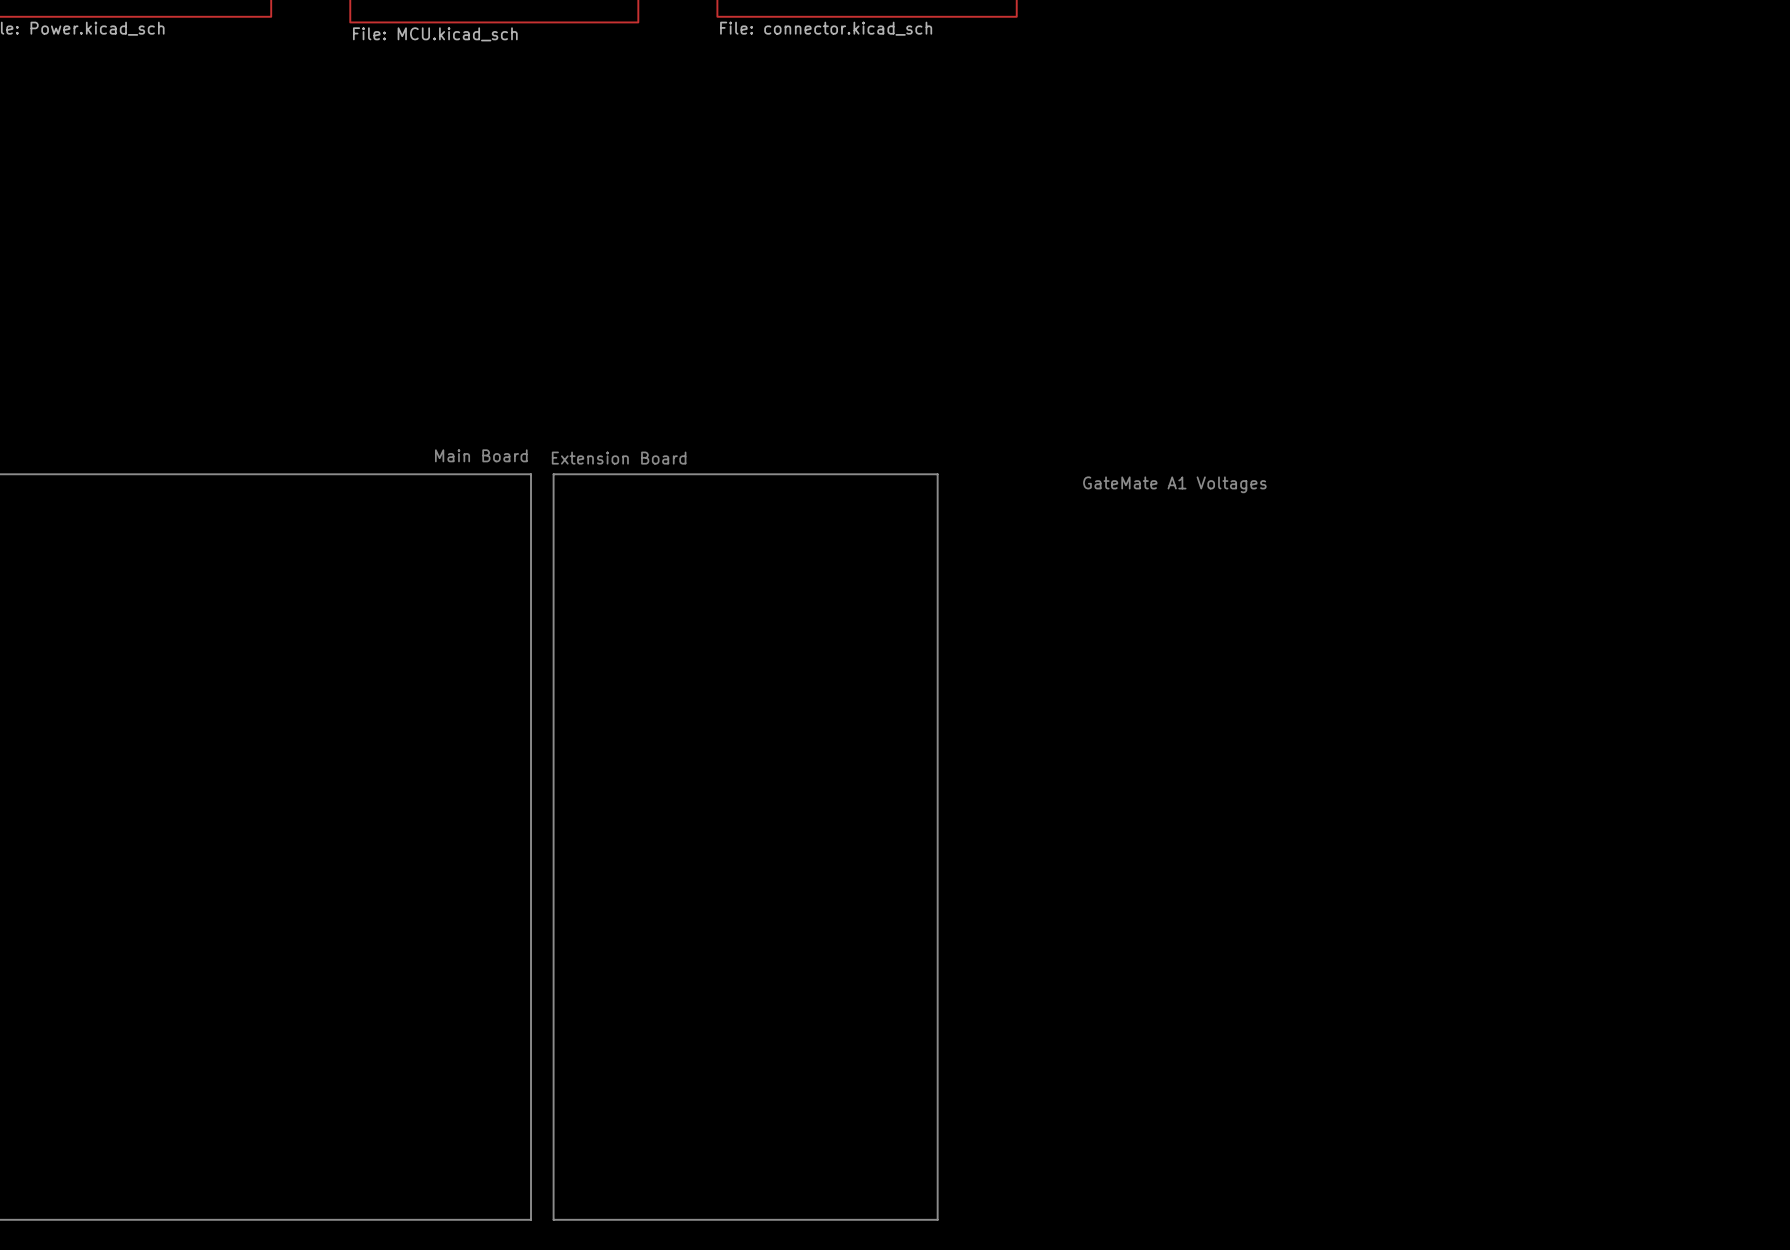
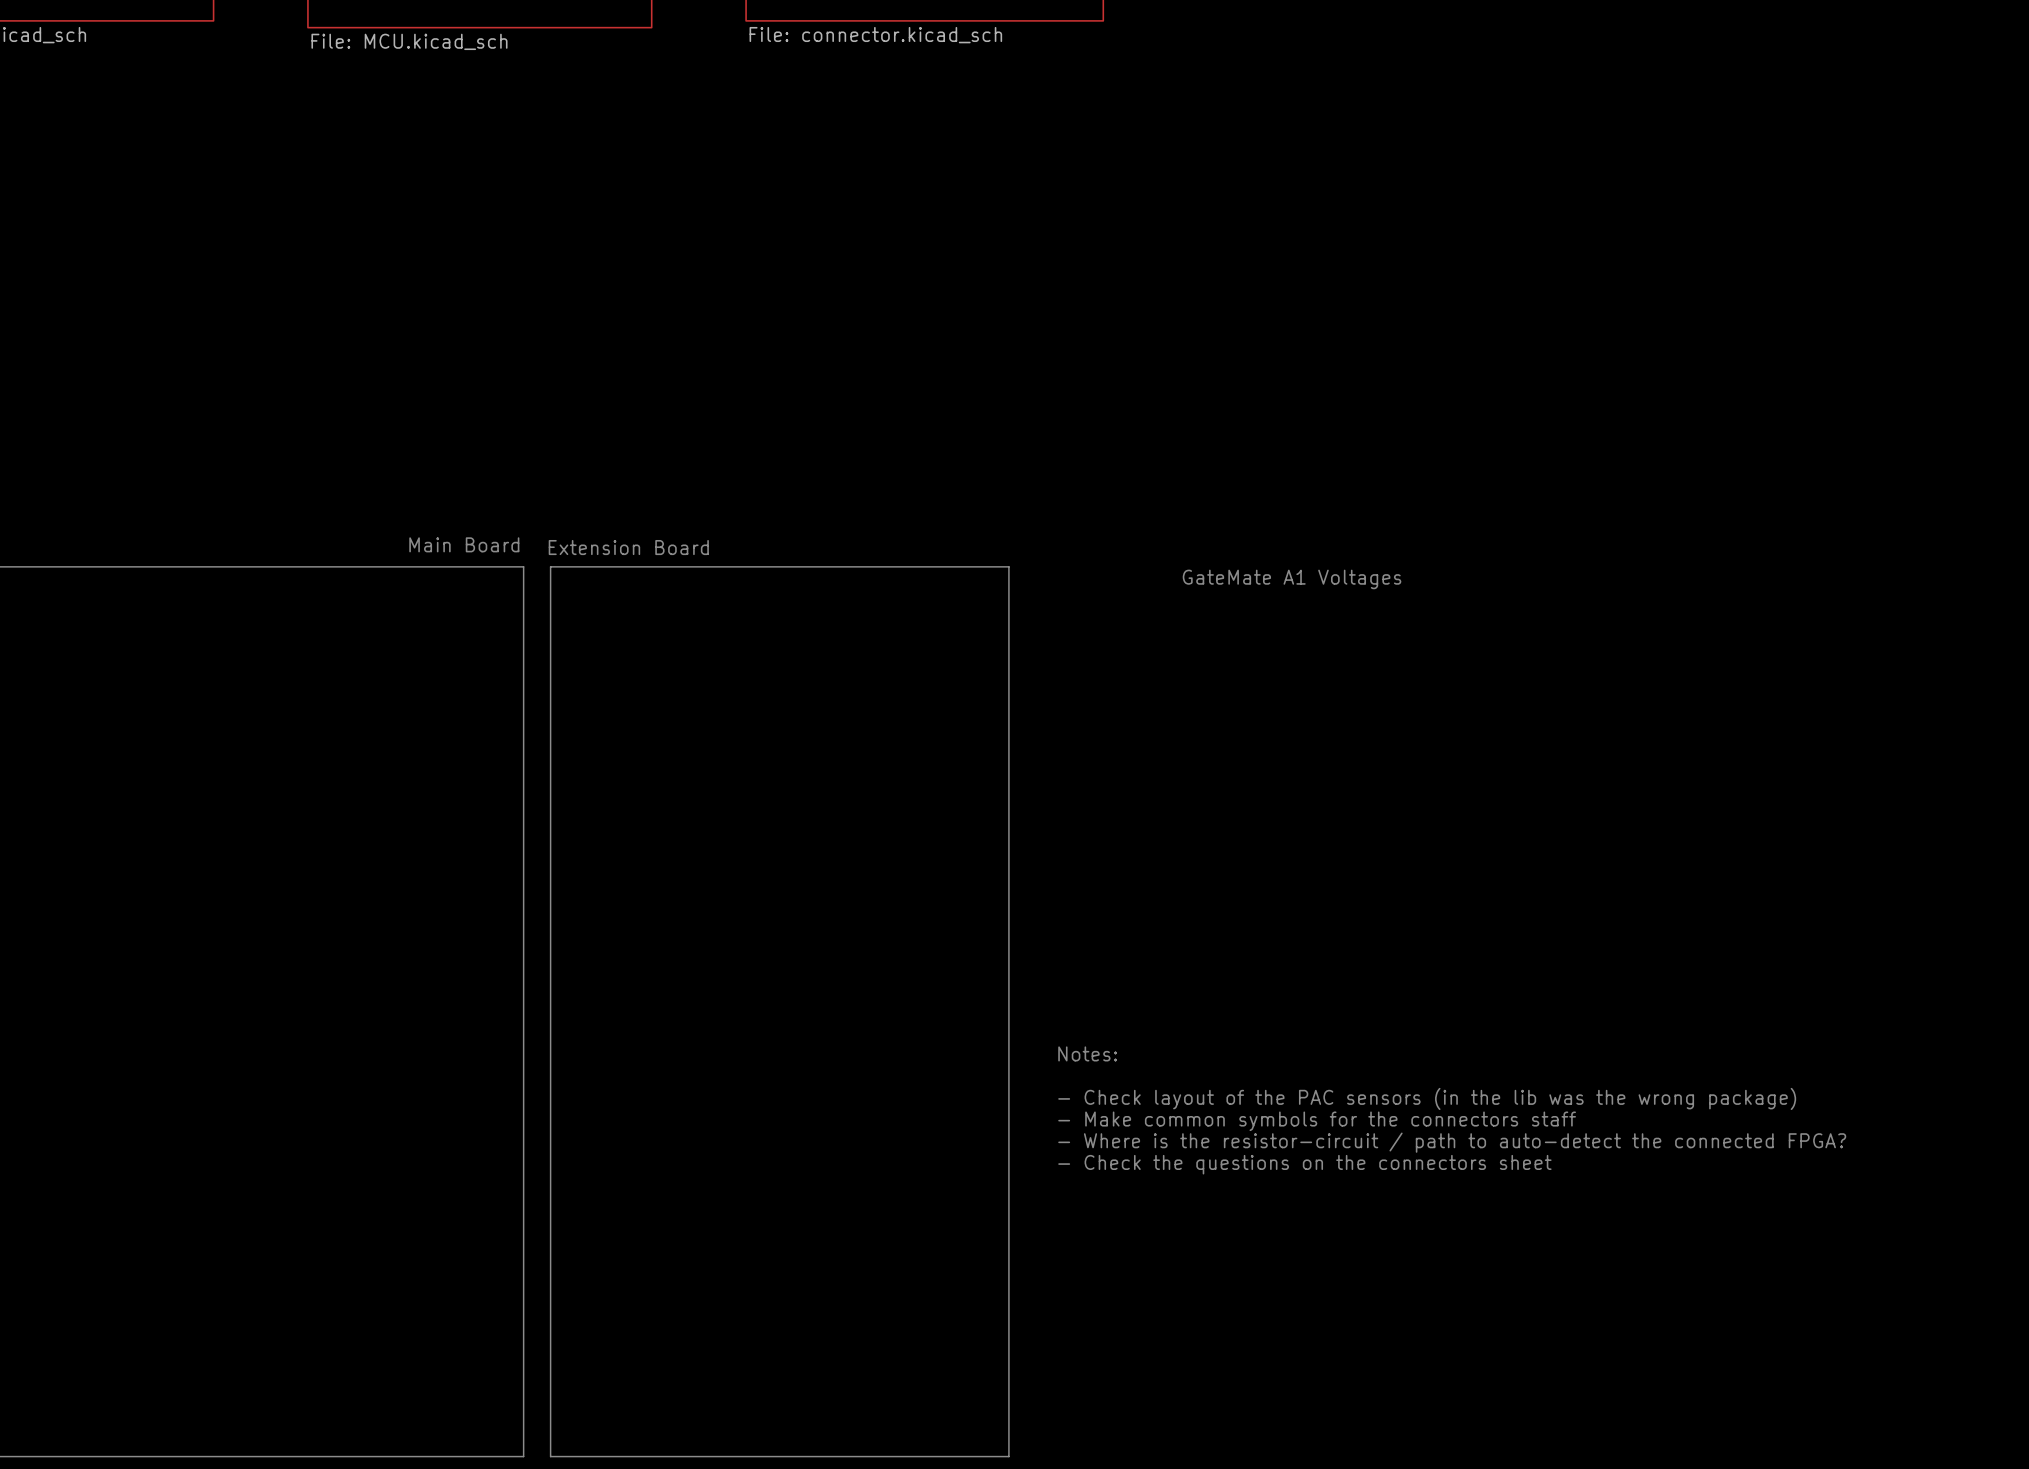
text: none -> Notes: (1087, 1053)
text: none -> - Check layout of the PAC sensors (in the lib was the wrong package) (1427, 1098)
text: none -> - Make common symbols for the connectors staff (1317, 1121)
text: none -> - Where is the resistor-circuit / path to auto-detect the connected FPGA? (1452, 1142)
text: none -> - Check the questions on the connectors sheet (1304, 1164)

